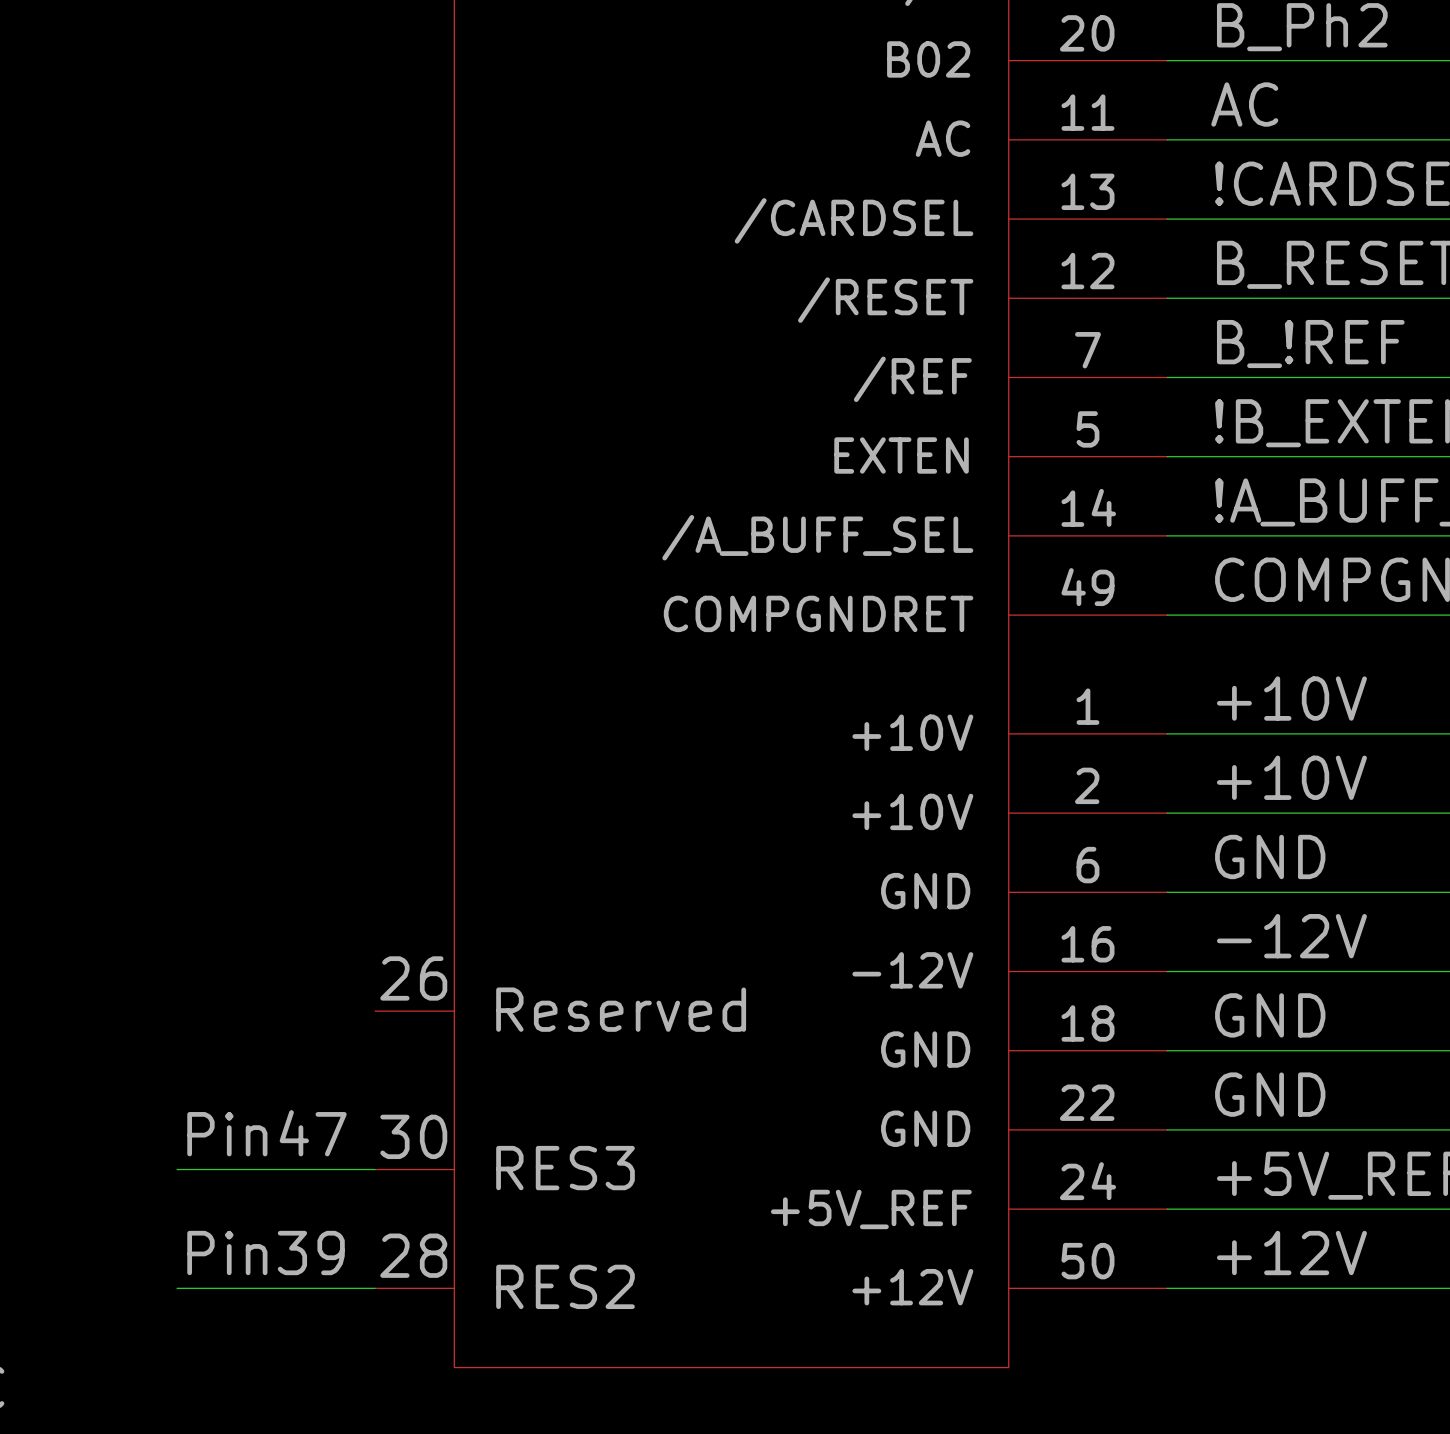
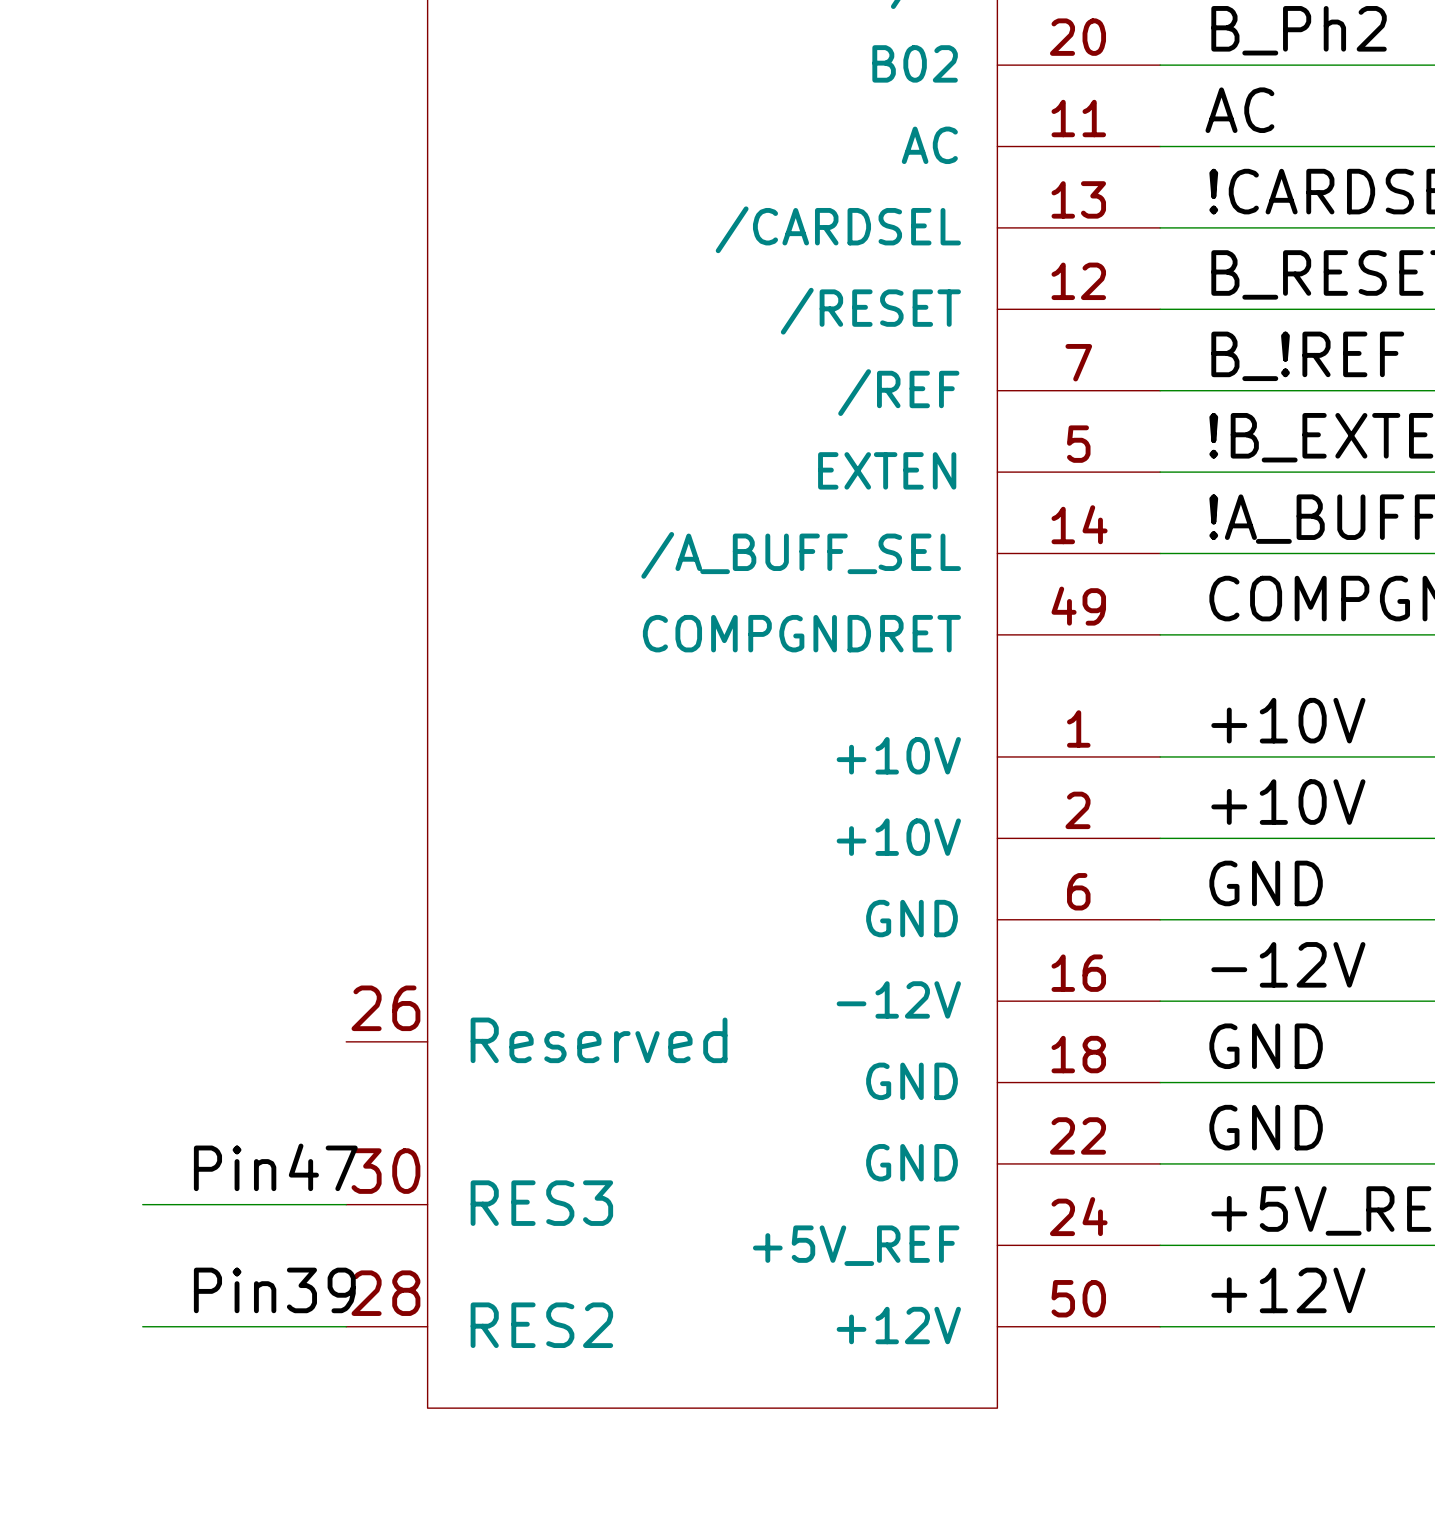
label position: Pin47 (266, 1133) -> Pin47 (275, 1167)
label position: Pin39 (266, 1253) -> Pin39 (274, 1290)

